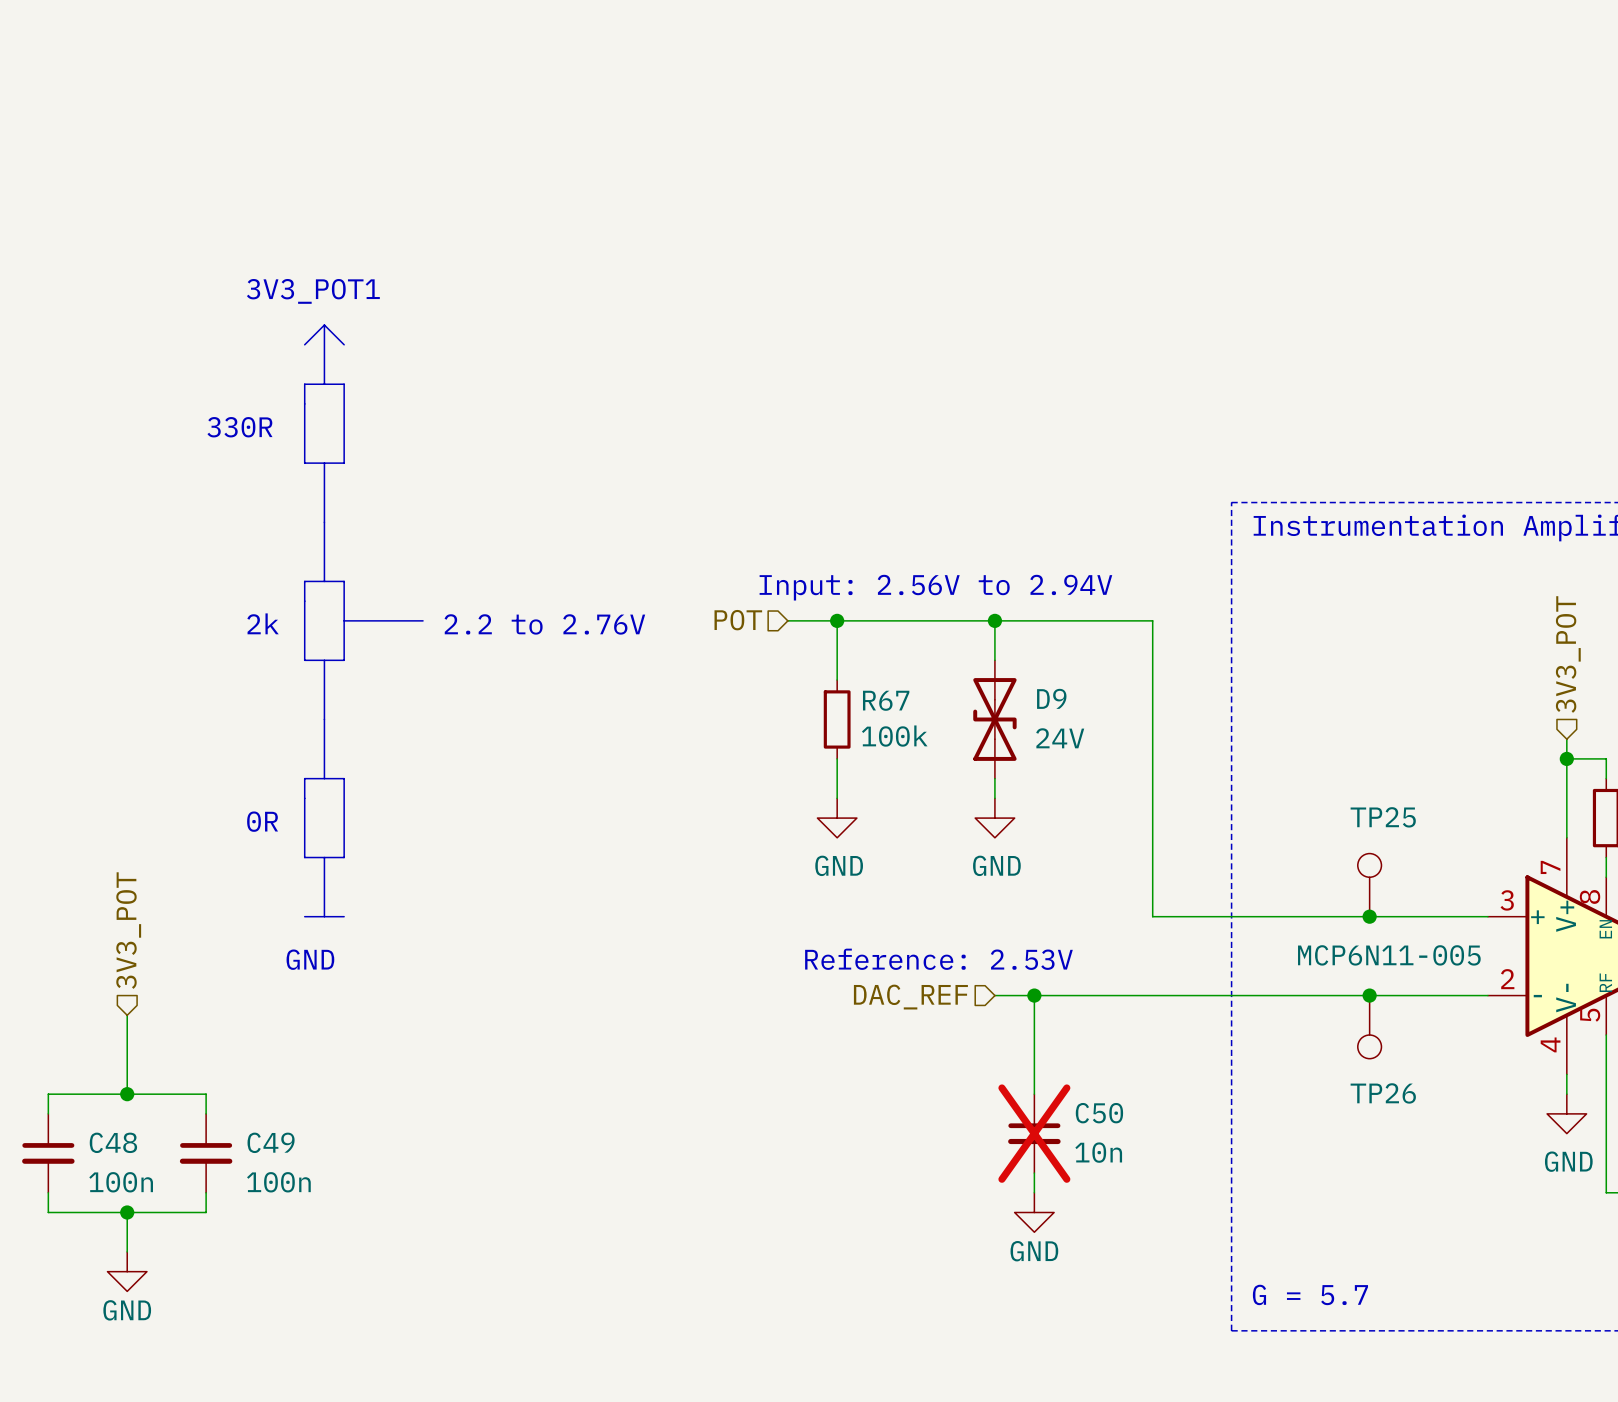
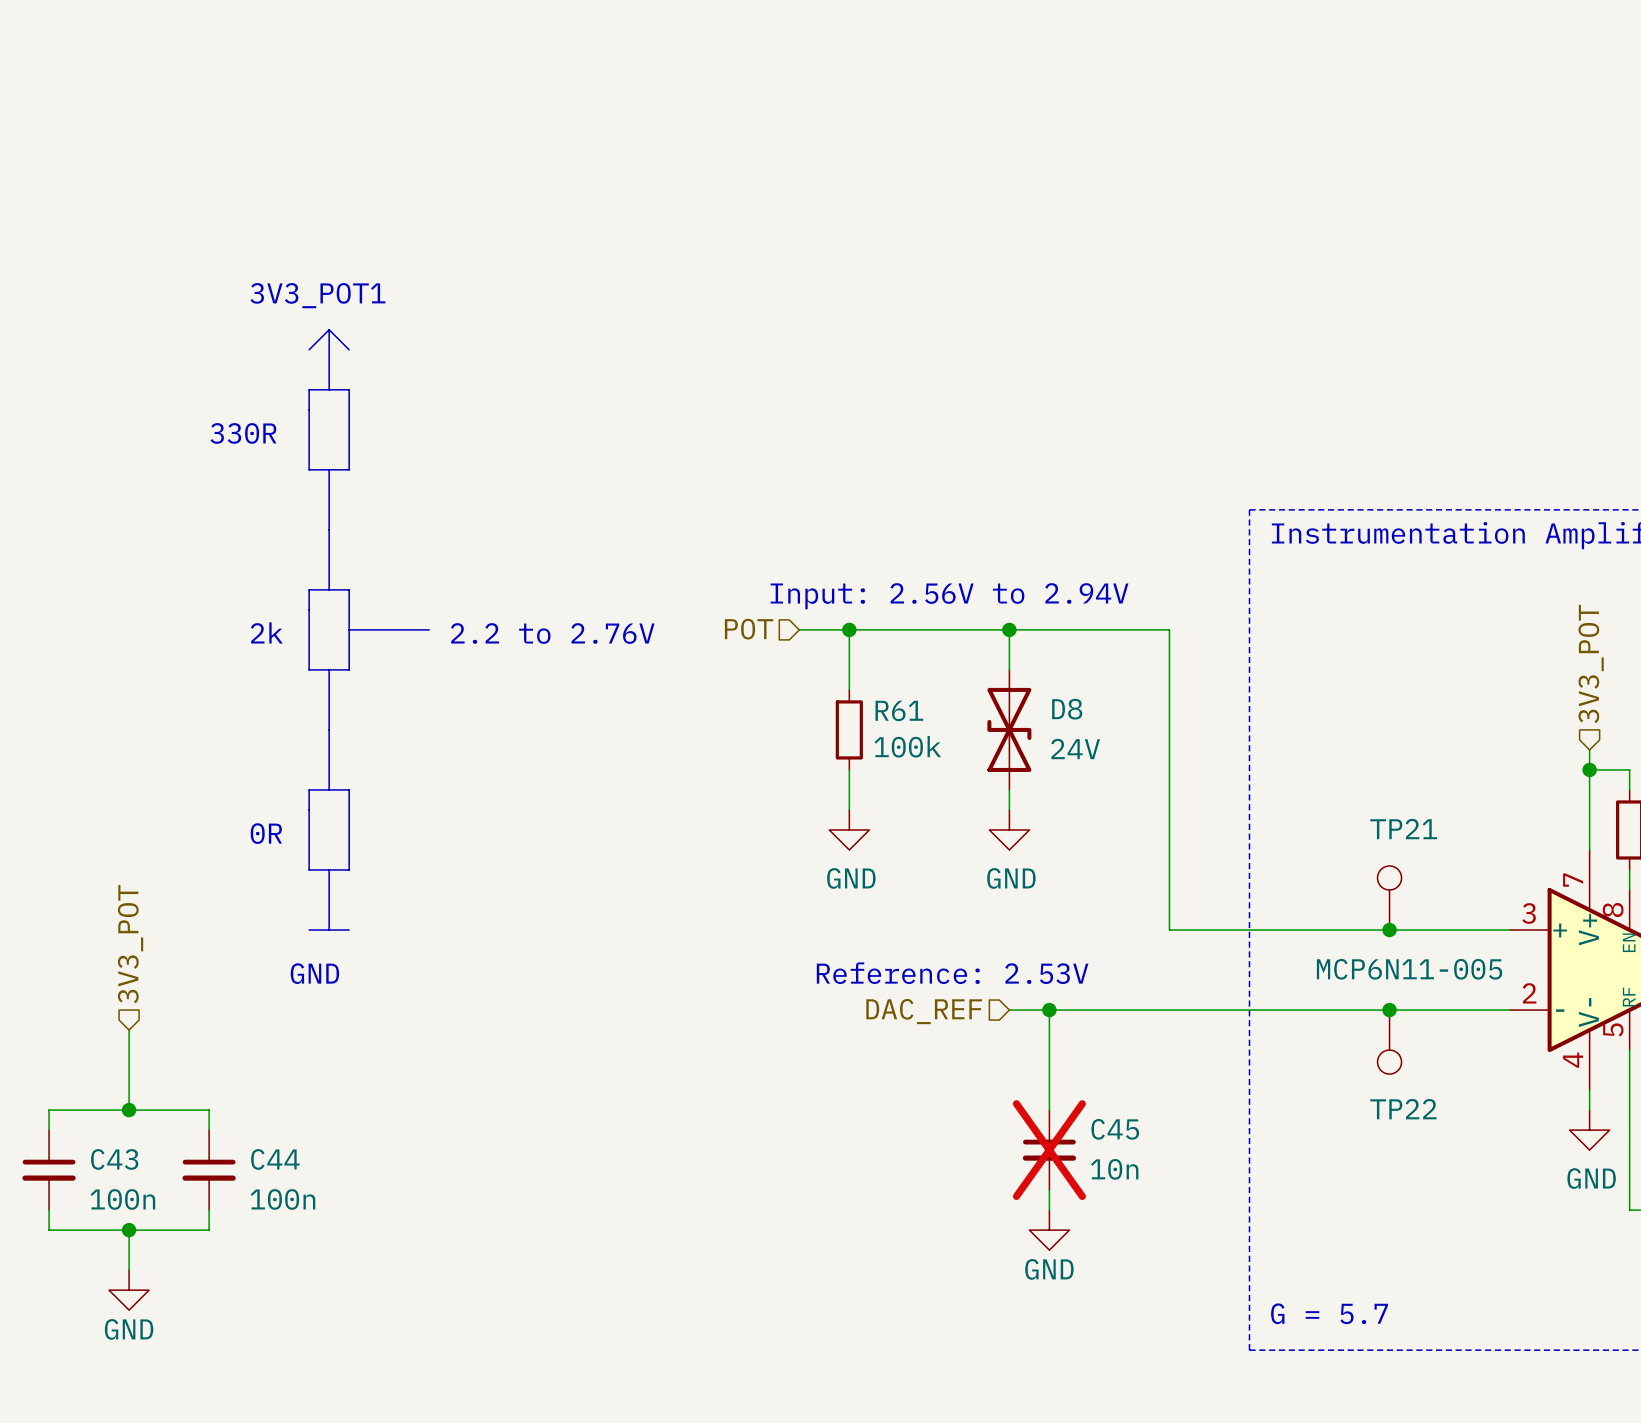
D9 name: D9 (1051, 698) -> D8 (1067, 709)
R67 name: R67 (886, 700) -> R61 (899, 710)
TP25 name: TP25 (1383, 817) -> TP21 (1403, 829)
TP26 name: TP26 (1383, 1093) -> TP22 (1403, 1109)
C50 name: C50 (1099, 1113) -> C45 (1115, 1129)
C48 name: C48 (113, 1142) -> C43 (114, 1159)
C49 name: C49 (271, 1142) -> C44 (275, 1159)

